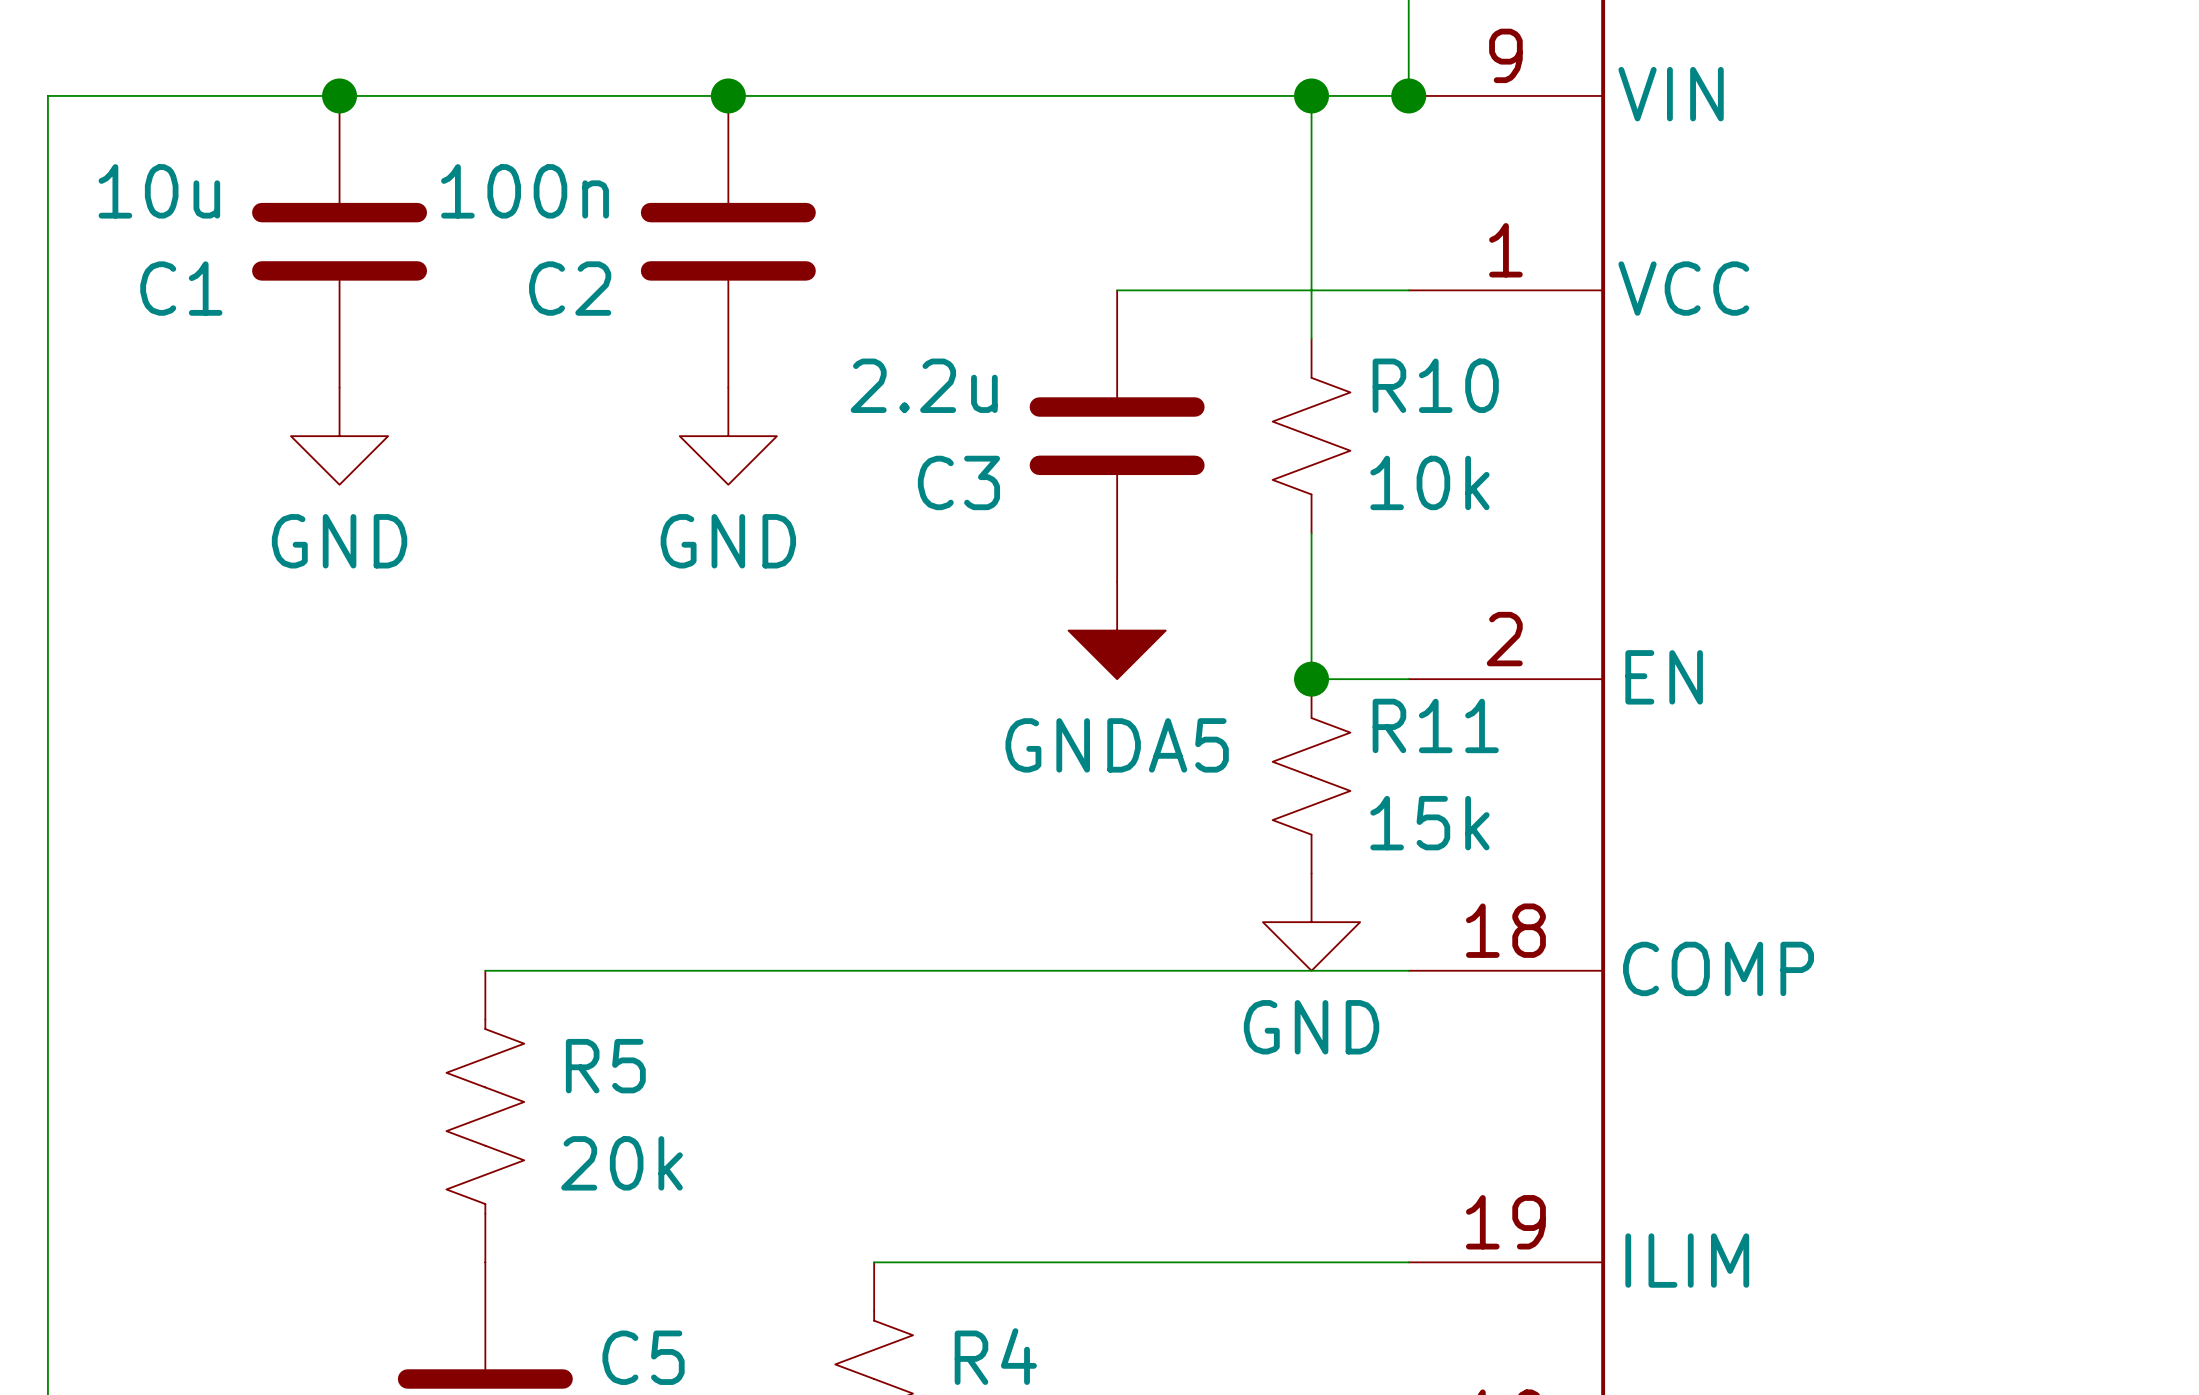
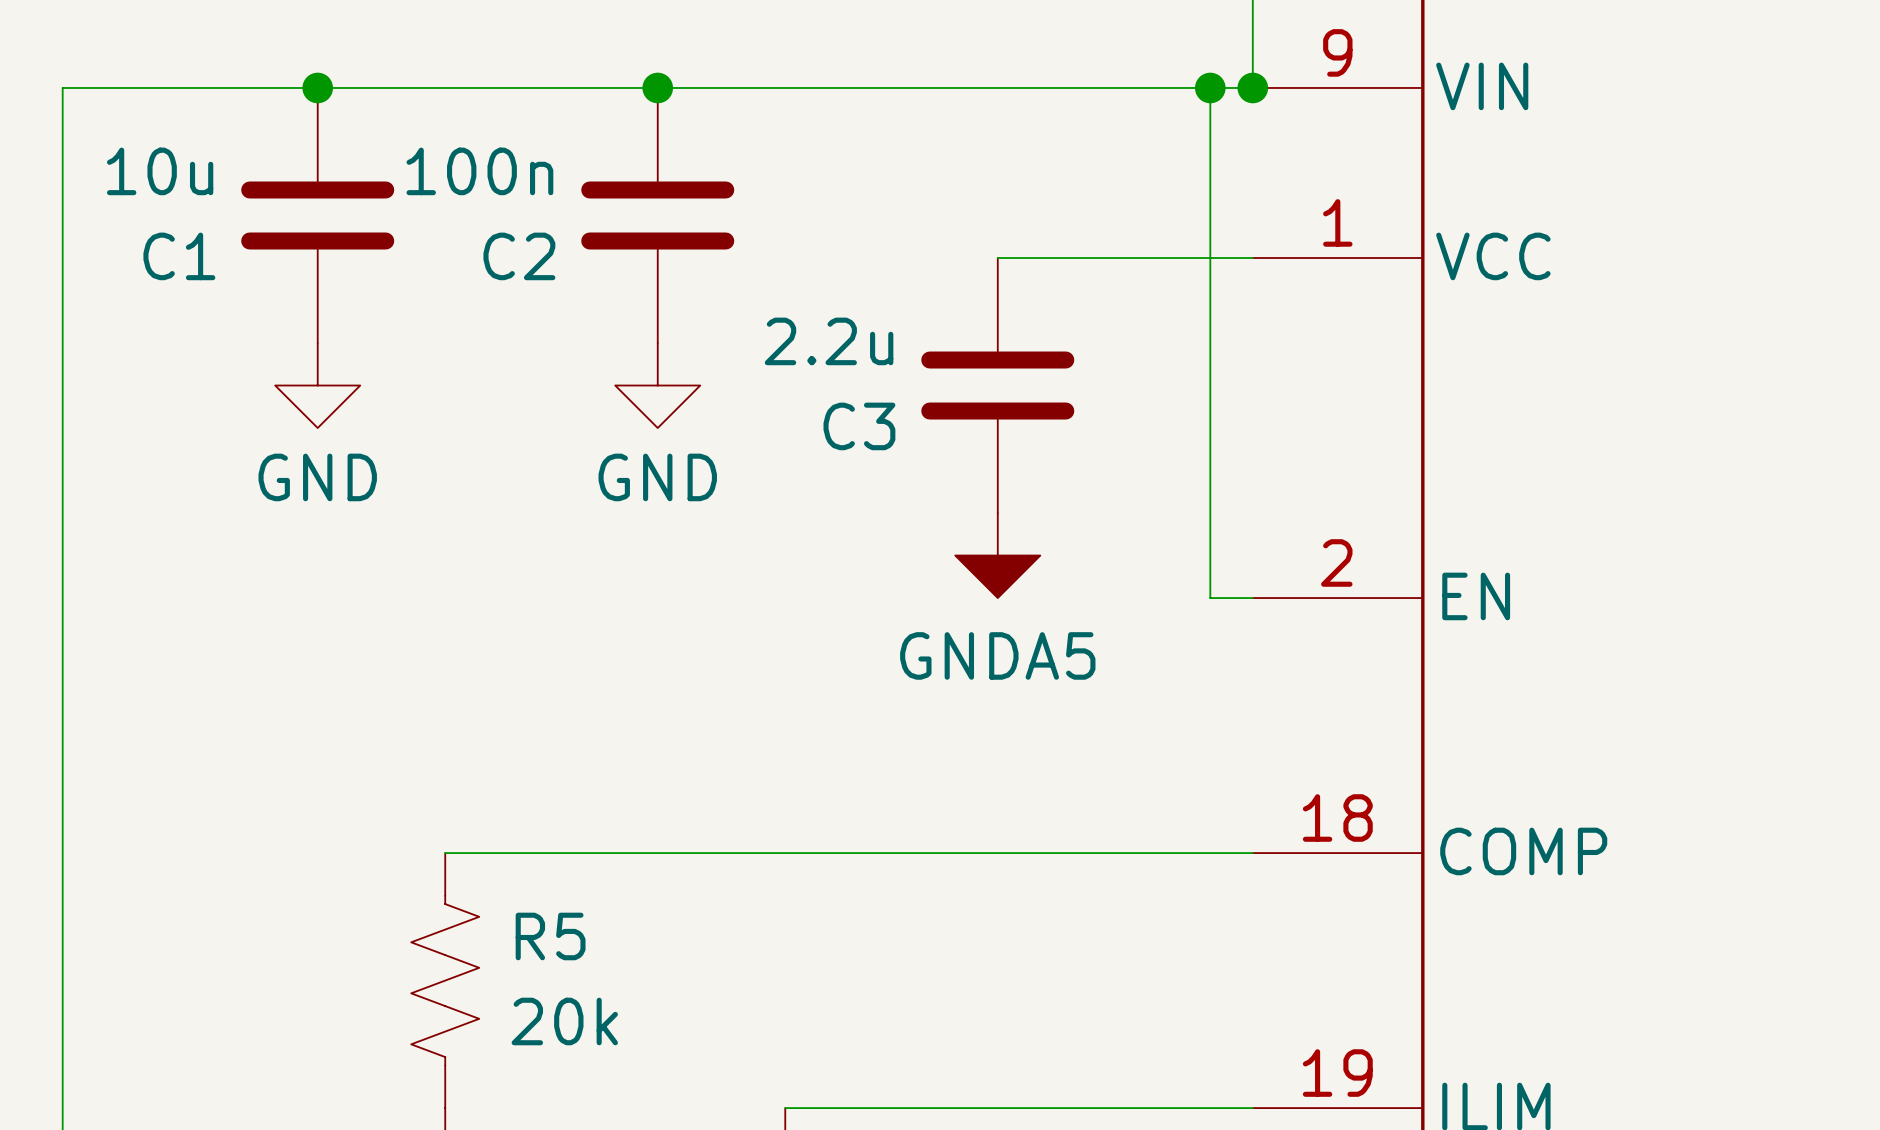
wire: (1311, 95) (1311, 338) -> none
junction position: (1311, 95) -> (1210, 87)
R10: 10k (1311, 436) -> none
wire: (1311, 533) (1311, 679) (1360, 679) -> (1210, 87) (1210, 598)
junction: (1311, 679) -> none
R11: 15k (1311, 776) -> none
power symbol: GND (1311, 922) -> none

